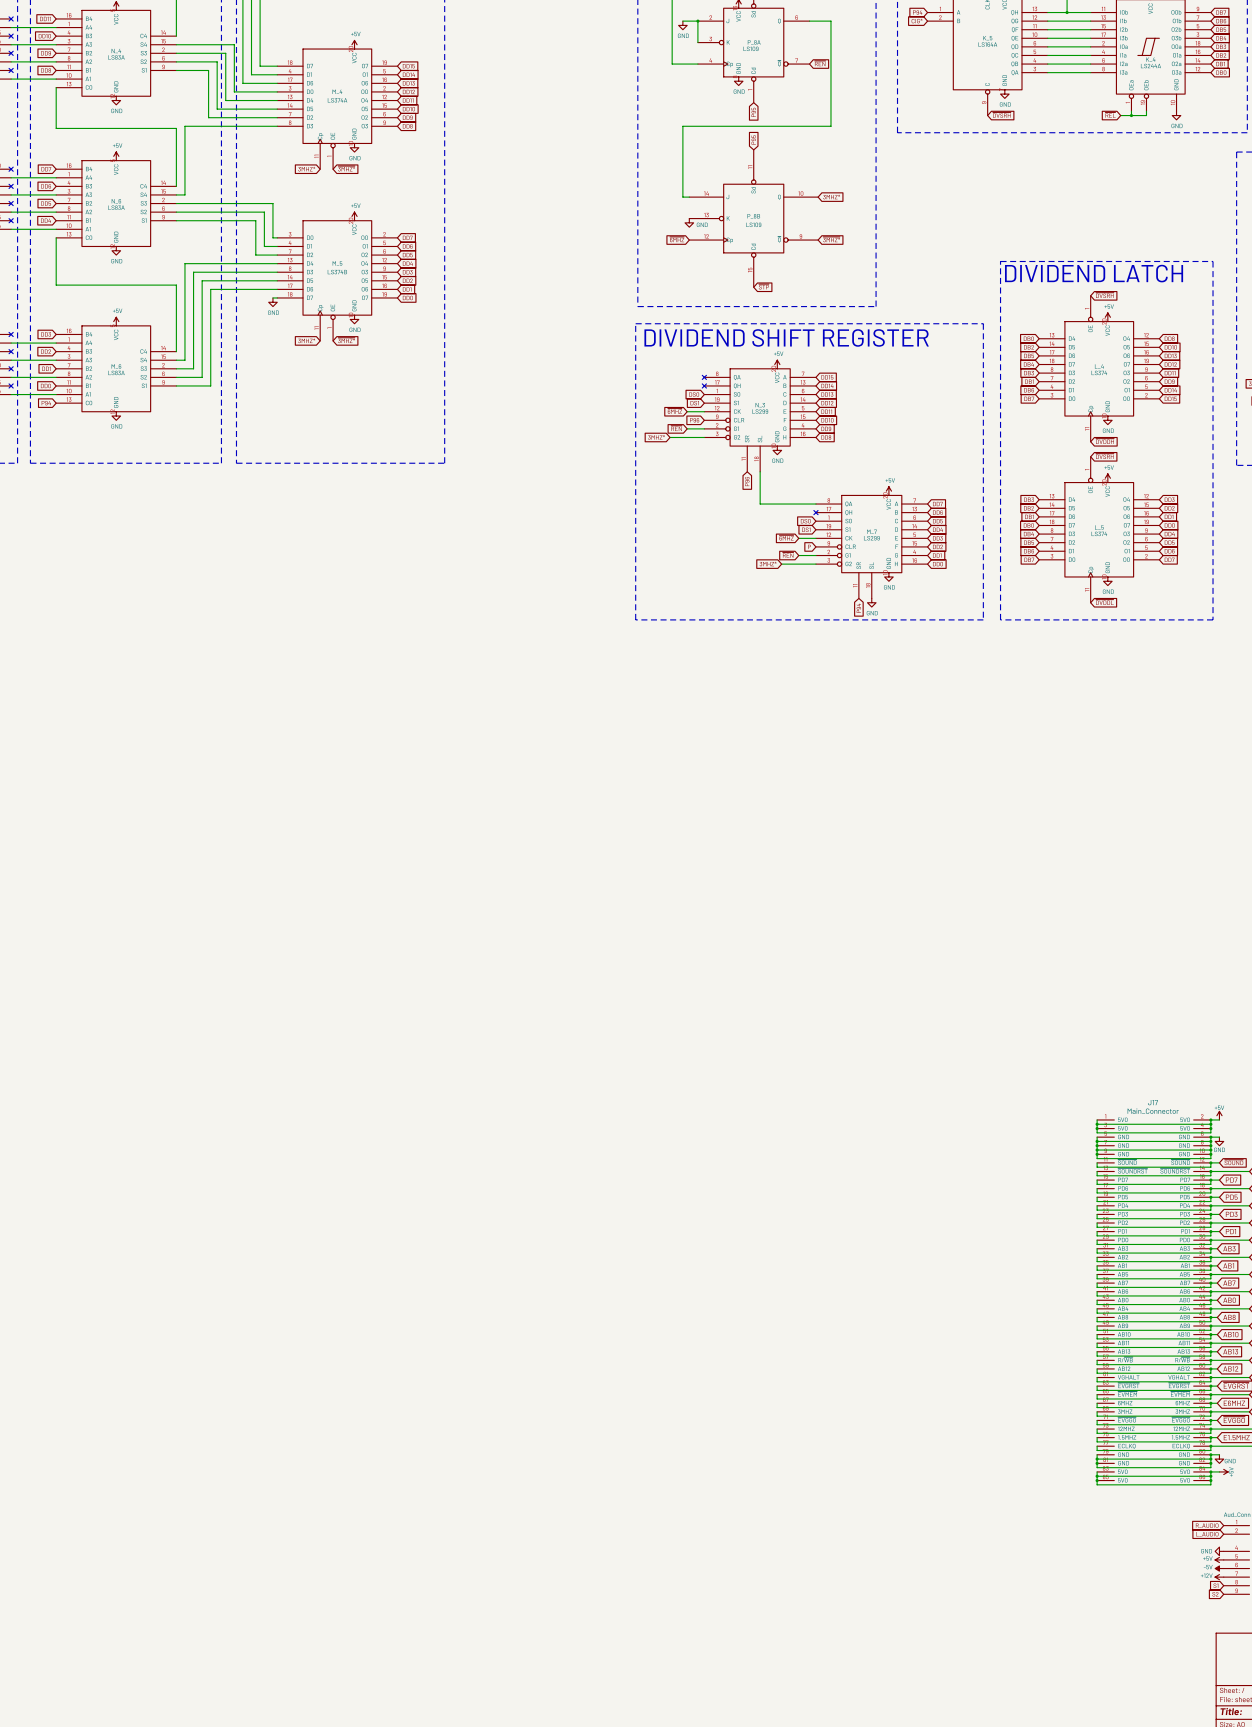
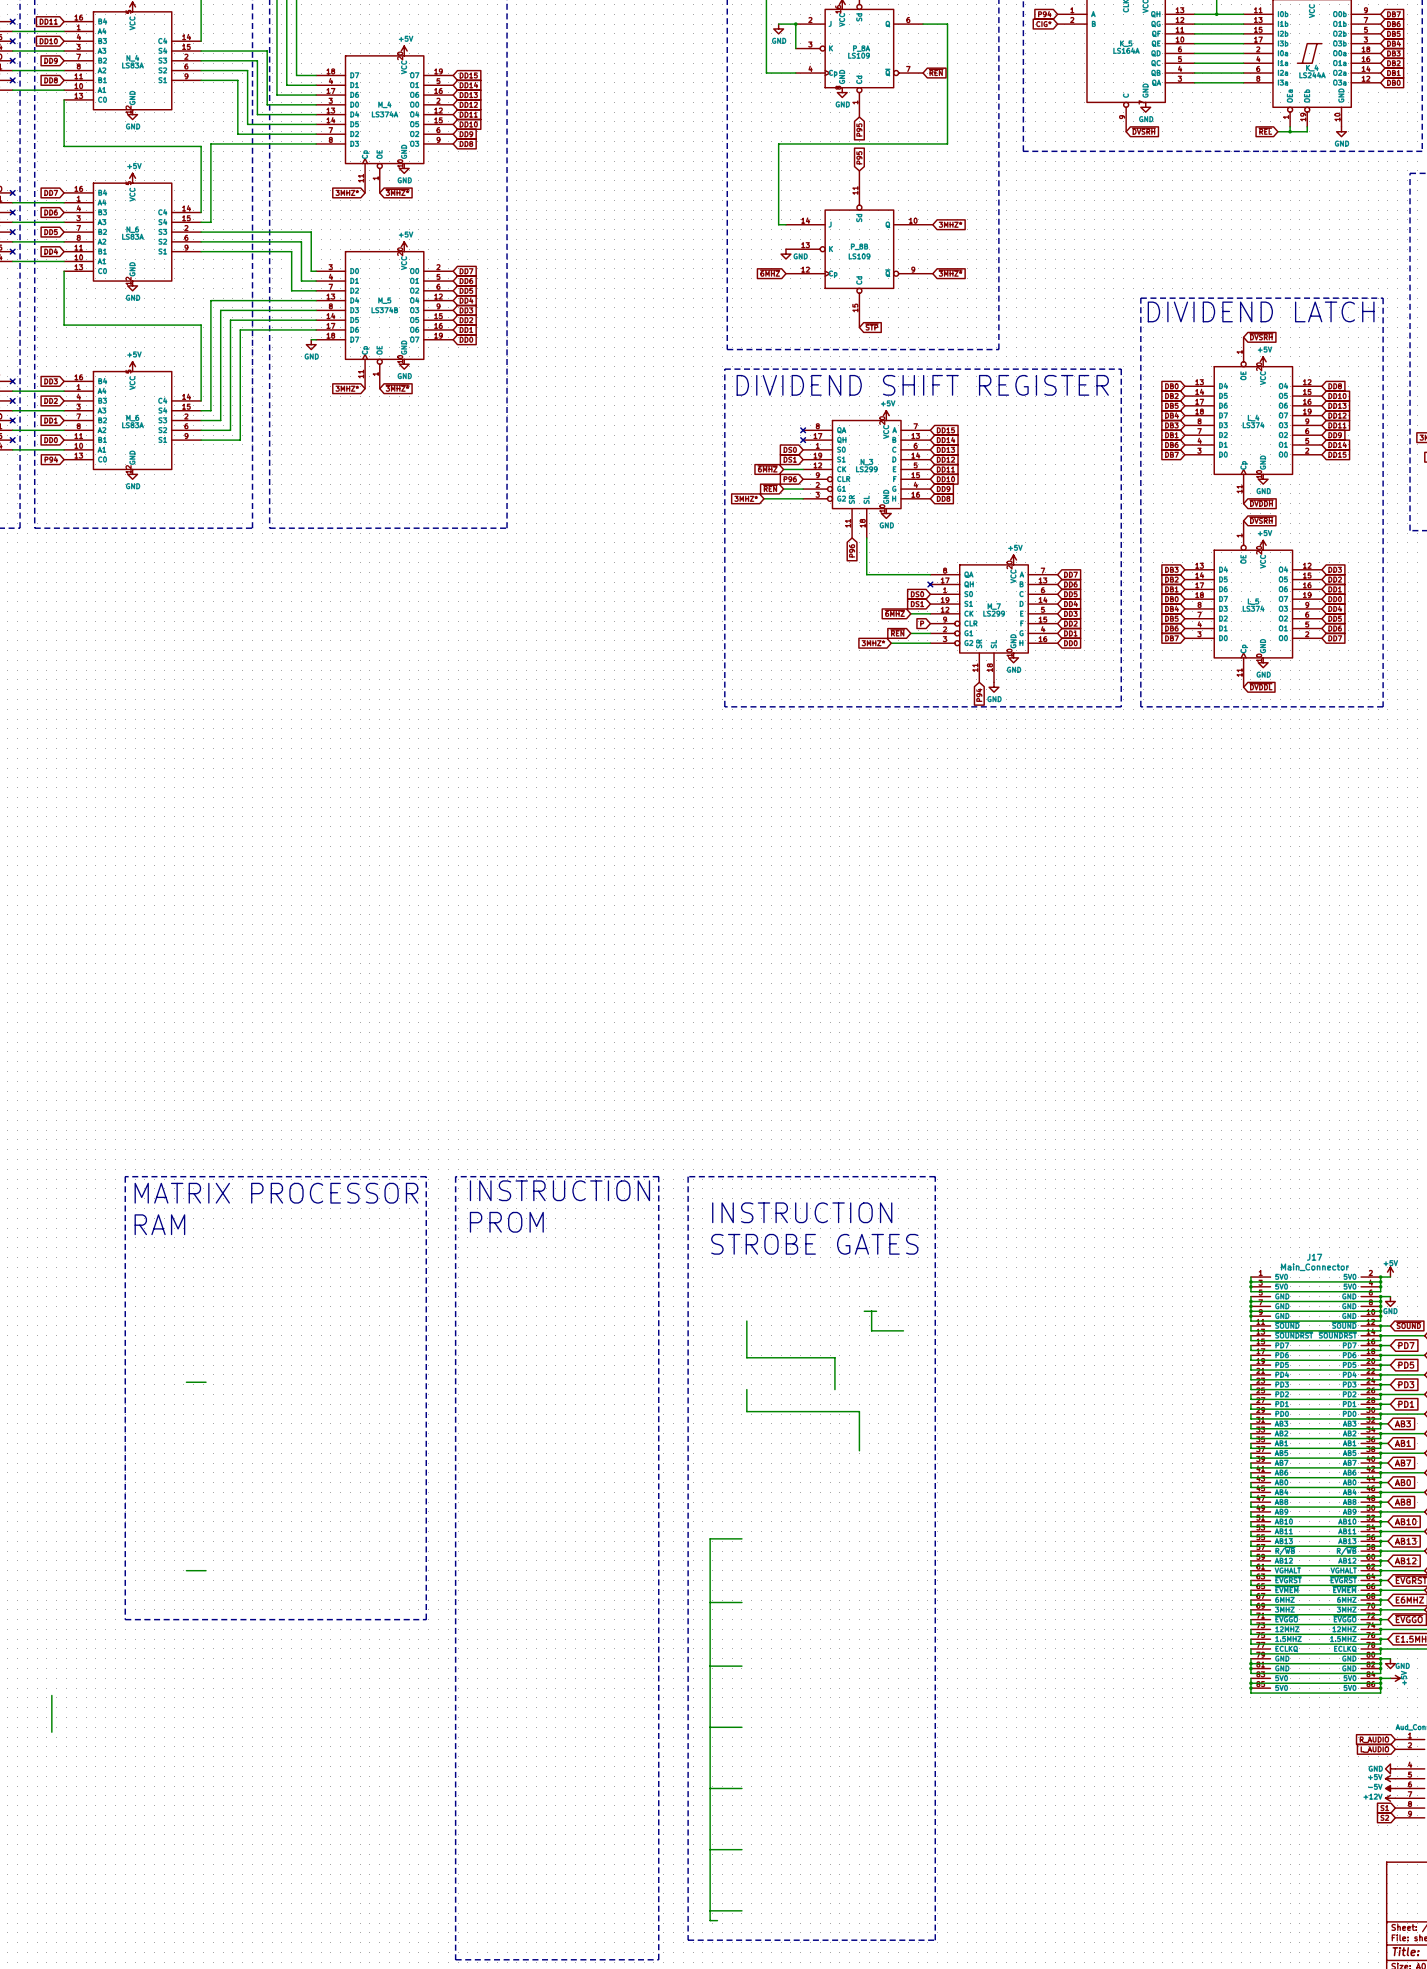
line: none -> (125, 1176) (125, 1619) (426, 1619) (426, 1176) (125, 1176)
line: none -> (455, 1176) (658, 1176) (658, 1959) (455, 1959) (455, 1176)
line: none -> (688, 1176) (935, 1176) (935, 1940) (688, 1940) (688, 1176)
text: none -> INSTRUCTION (559, 1190)
text: none -> MATRIX PROCESSOR (276, 1193)
text: none -> INSTRUCTION (802, 1212)
text: none -> PROM (506, 1222)
text: none -> RAM (159, 1224)
text: none -> STROBE GATES (814, 1244)
wire: none -> (864, 1311) (876, 1311)
wire: none -> (871, 1311) (871, 1330) (903, 1330)
wire: none -> (746, 1321) (746, 1357) (834, 1357) (834, 1389)
wire: none -> (186, 1382) (206, 1382)
wire: none -> (746, 1389) (746, 1411) (859, 1411) (859, 1450)
wire: none -> (741, 1538) (710, 1538) (710, 1920) (717, 1920)
wire: none -> (186, 1570) (206, 1570)
wire: none -> (710, 1602) (741, 1602)
wire: none -> (710, 1666) (741, 1666)
wire: none -> (51, 1695) (51, 1732)
wire: none -> (710, 1727) (741, 1727)
wire: none -> (710, 1788) (741, 1788)
wire: none -> (710, 1849) (741, 1849)
wire: none -> (710, 1910) (741, 1910)

